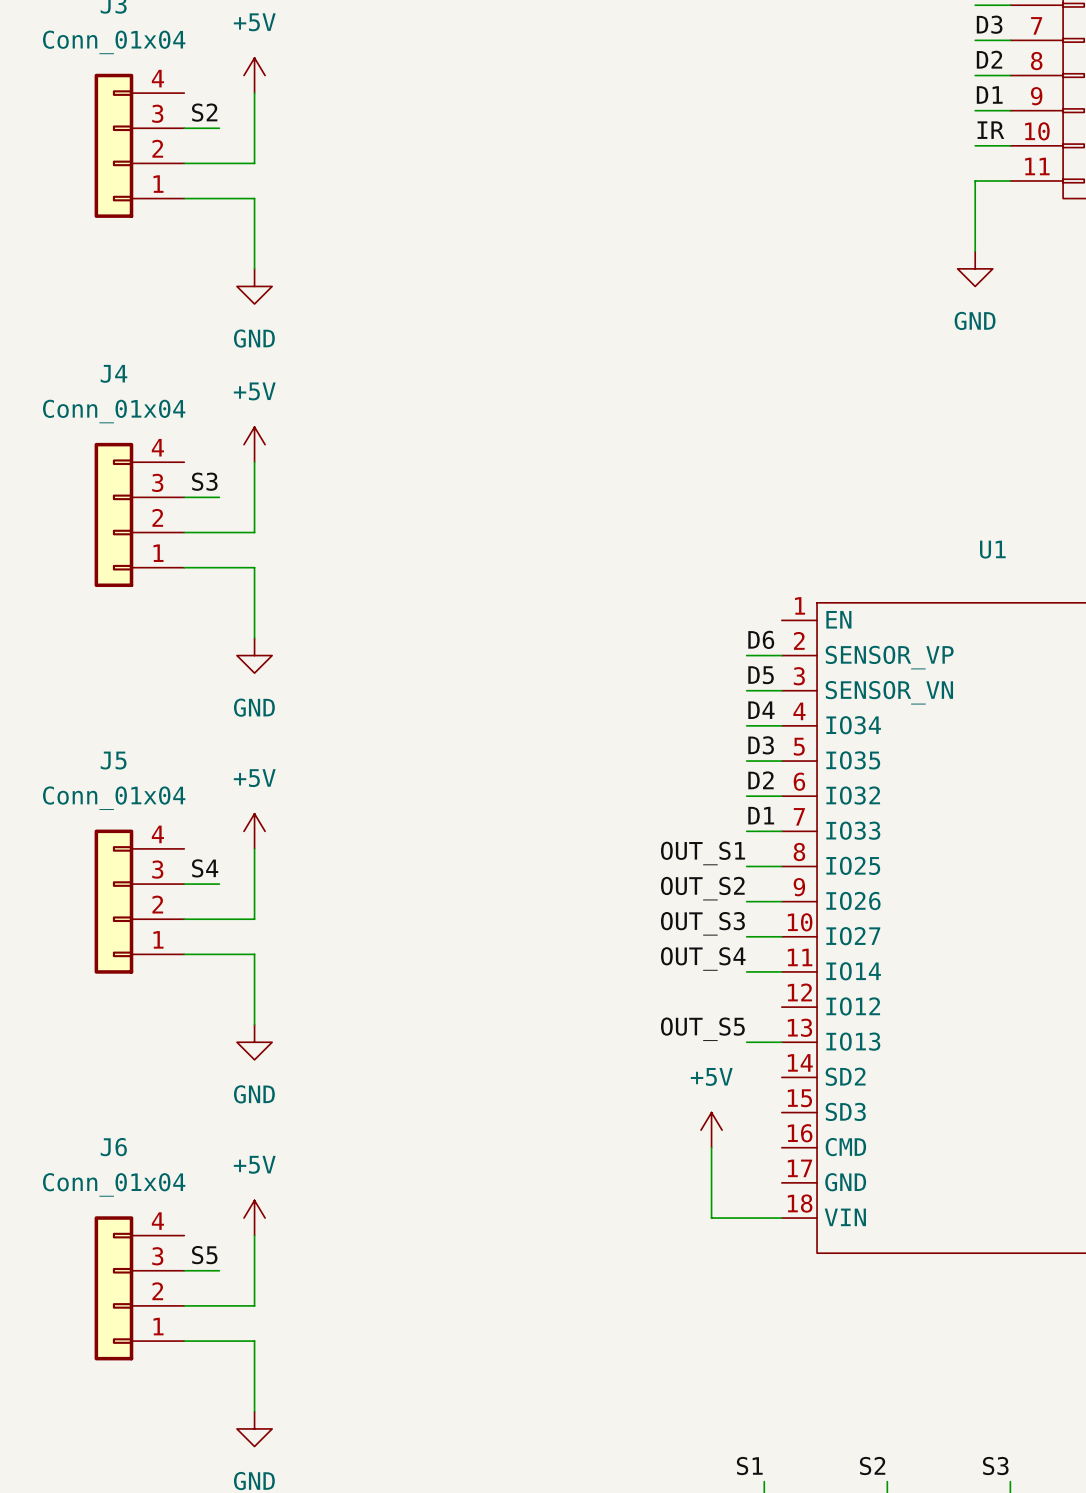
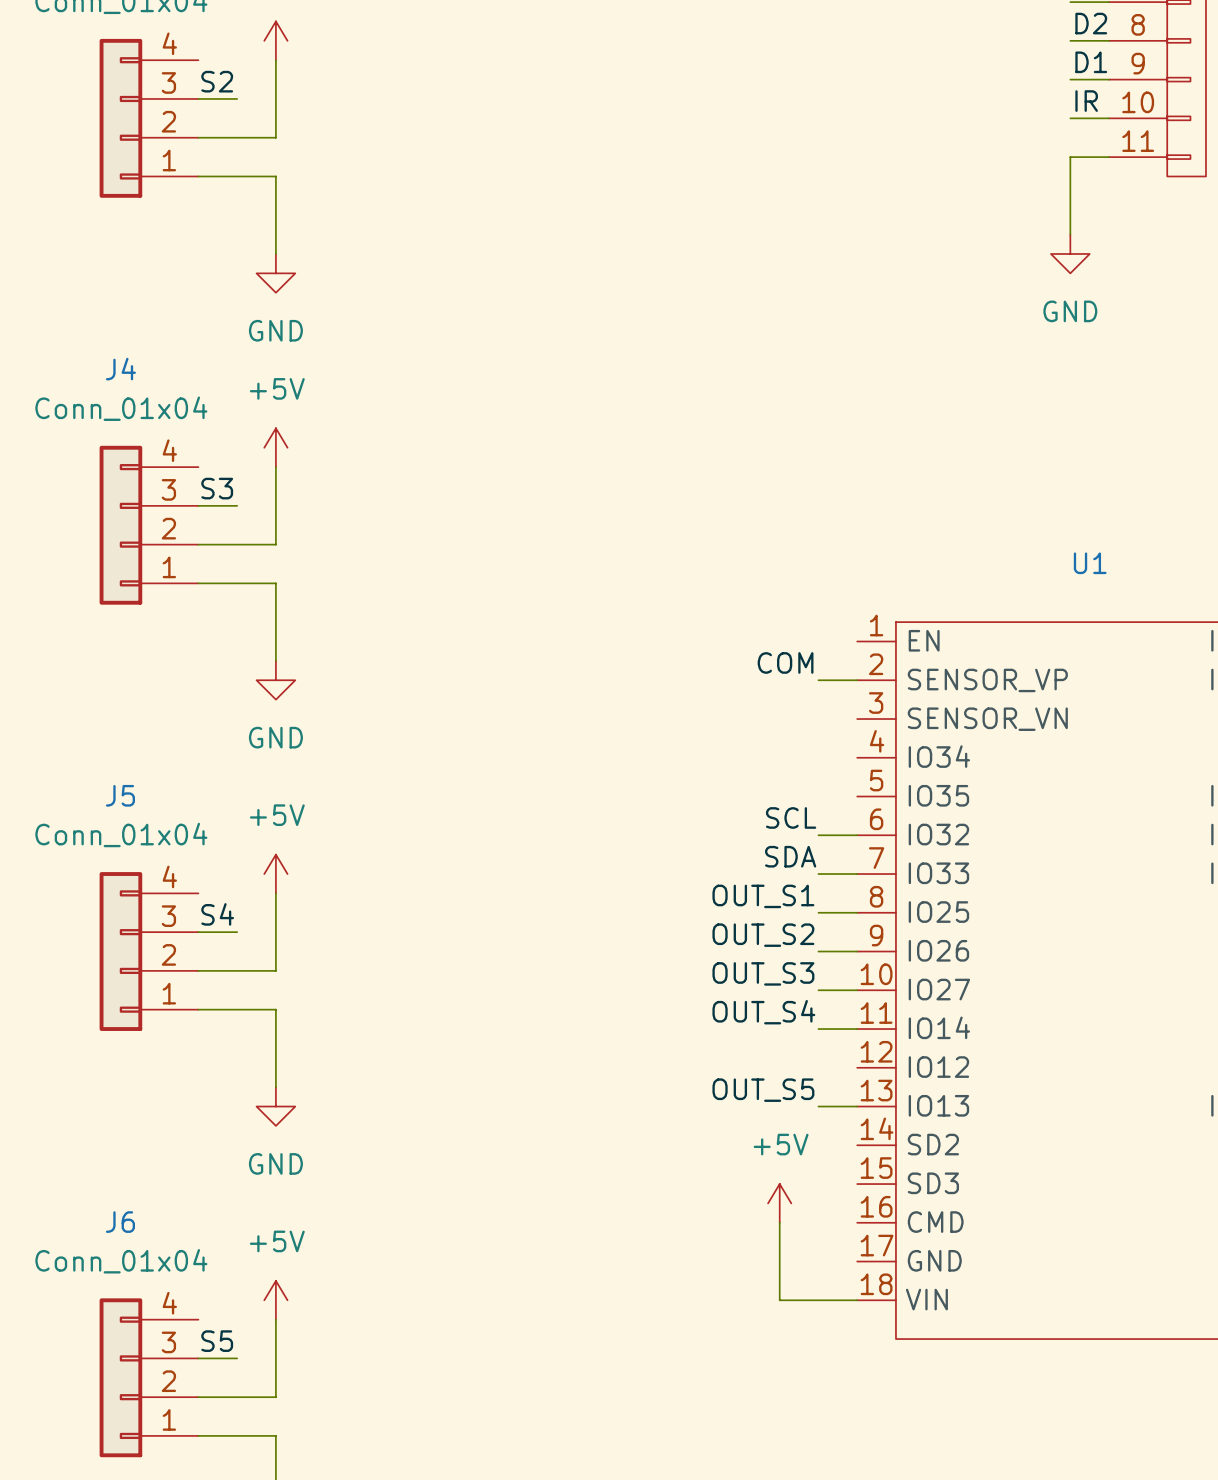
label: D6 (761, 639) -> COM (785, 662)
label: D5 (761, 675) -> none
wire: (746, 690) (781, 690) -> none
label: D4 (761, 710) -> none
wire: (746, 725) (781, 725) -> none
label: D3 (761, 745) -> none
wire: (746, 761) (781, 761) -> none
label: D2 (761, 780) -> SCL (791, 817)
label: D1 (761, 815) -> SDA (790, 856)

